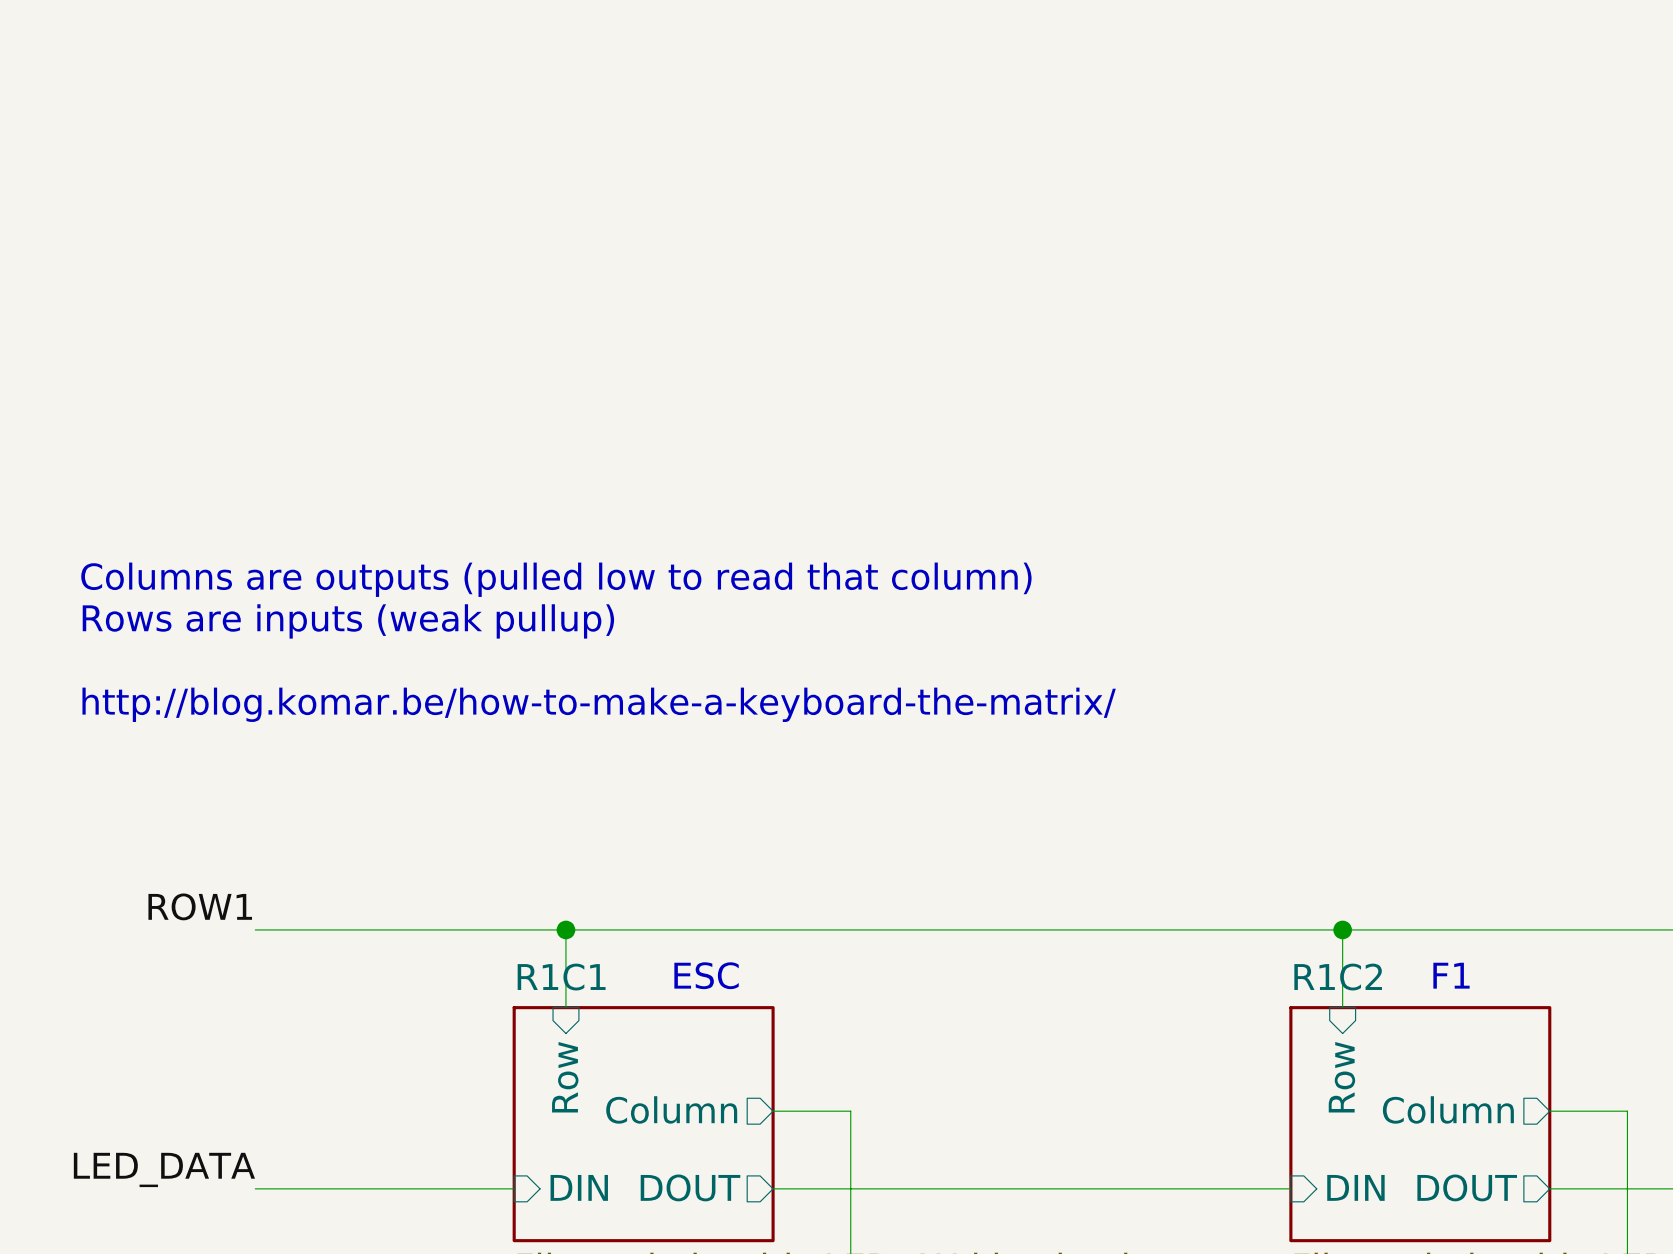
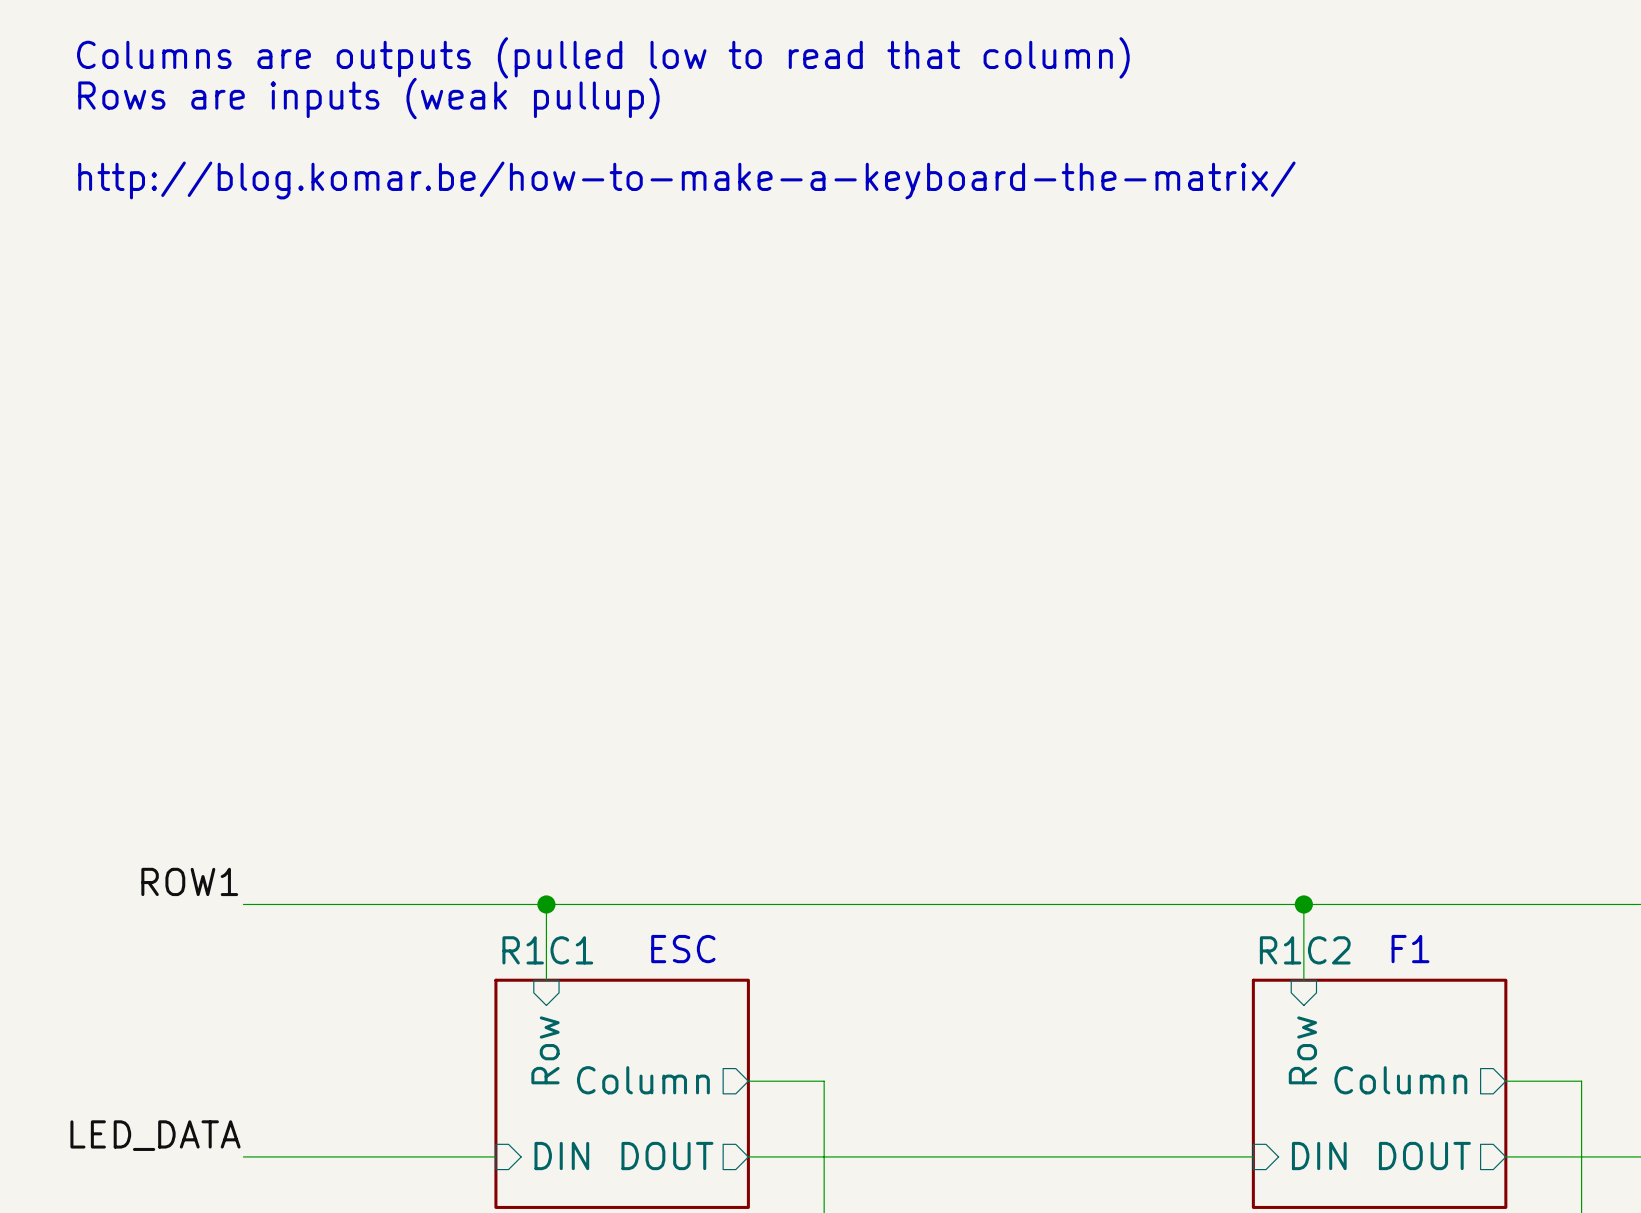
text: none -> Columns are outputs (pulled low to read that column) (603, 57)
text: none -> Rows are inputs (weak pullup) (368, 98)
text: none -> http://blog.komar.be/how-to-make-a-keyboard-the-matrix/ (686, 180)
text: Columns are outputs (pulled low to read that column) (556, 579) -> none
text: Rows are inputs (weak pullup) (348, 621) -> none
text: http://blog.komar.be/how-to-make-a-keyboard-the-matrix/ (599, 704) -> none

